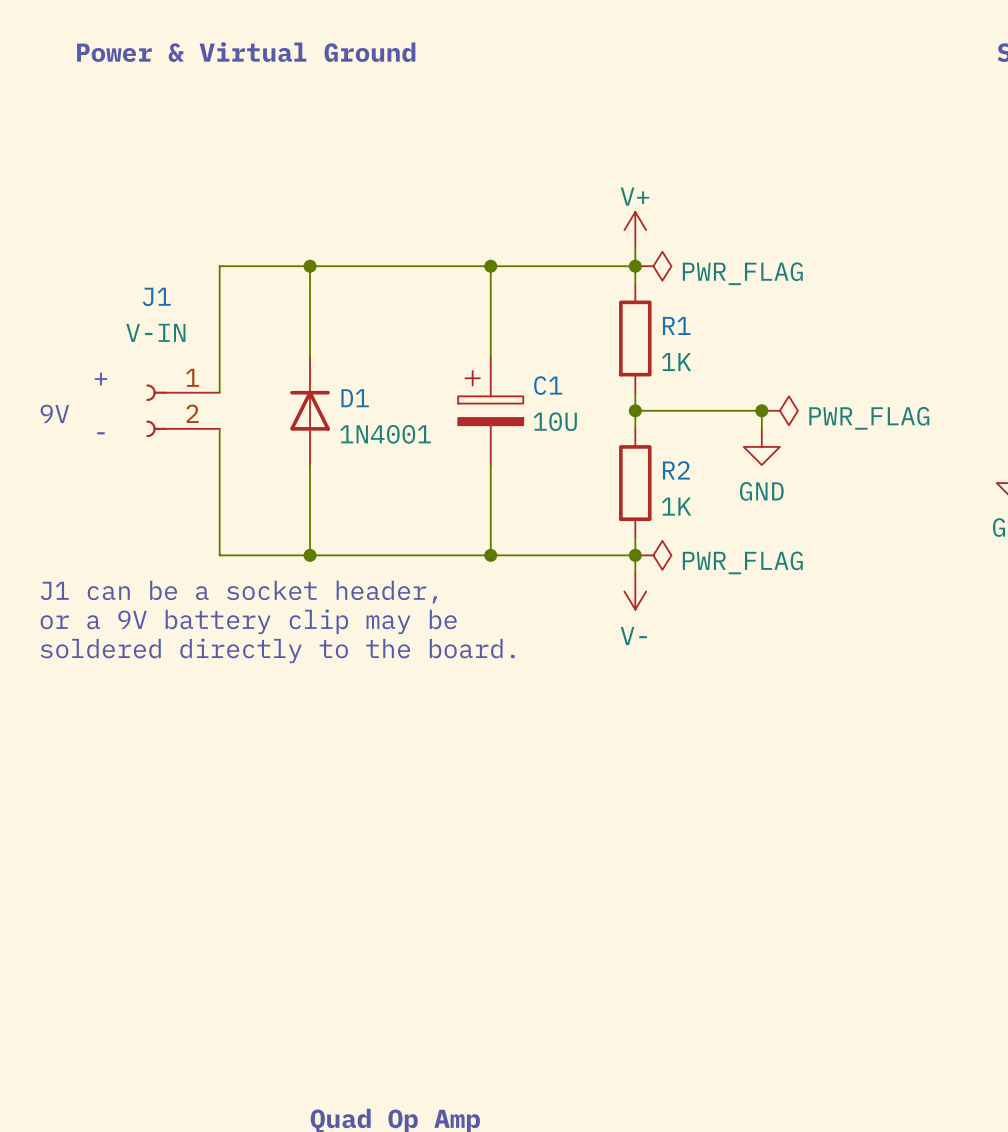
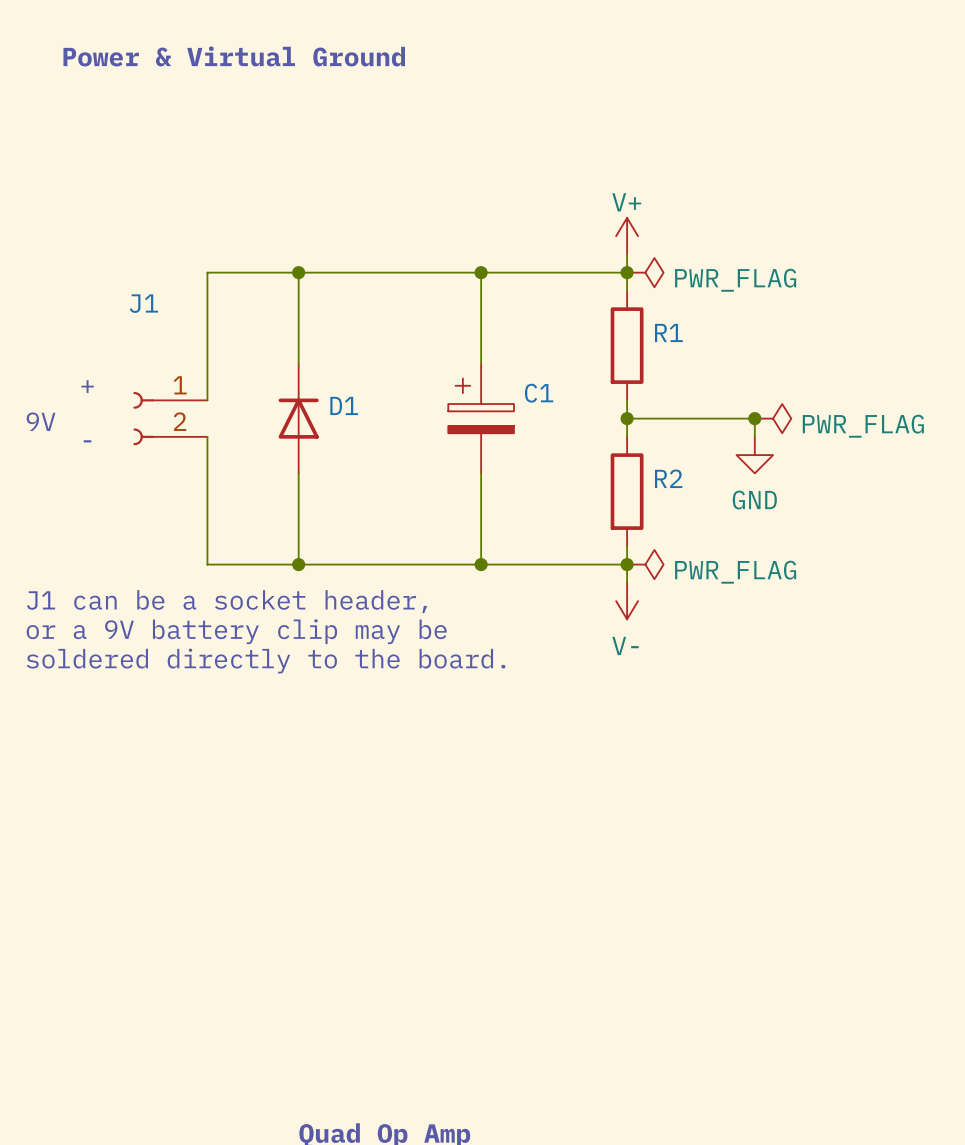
J1 value: V-IN (155, 332) -> none
R1 value: 1K (676, 362) -> none
C1 value: 10U (555, 421) -> none
D1 value: 1N4001 (385, 434) -> none
R2 value: 1K (676, 506) -> none

